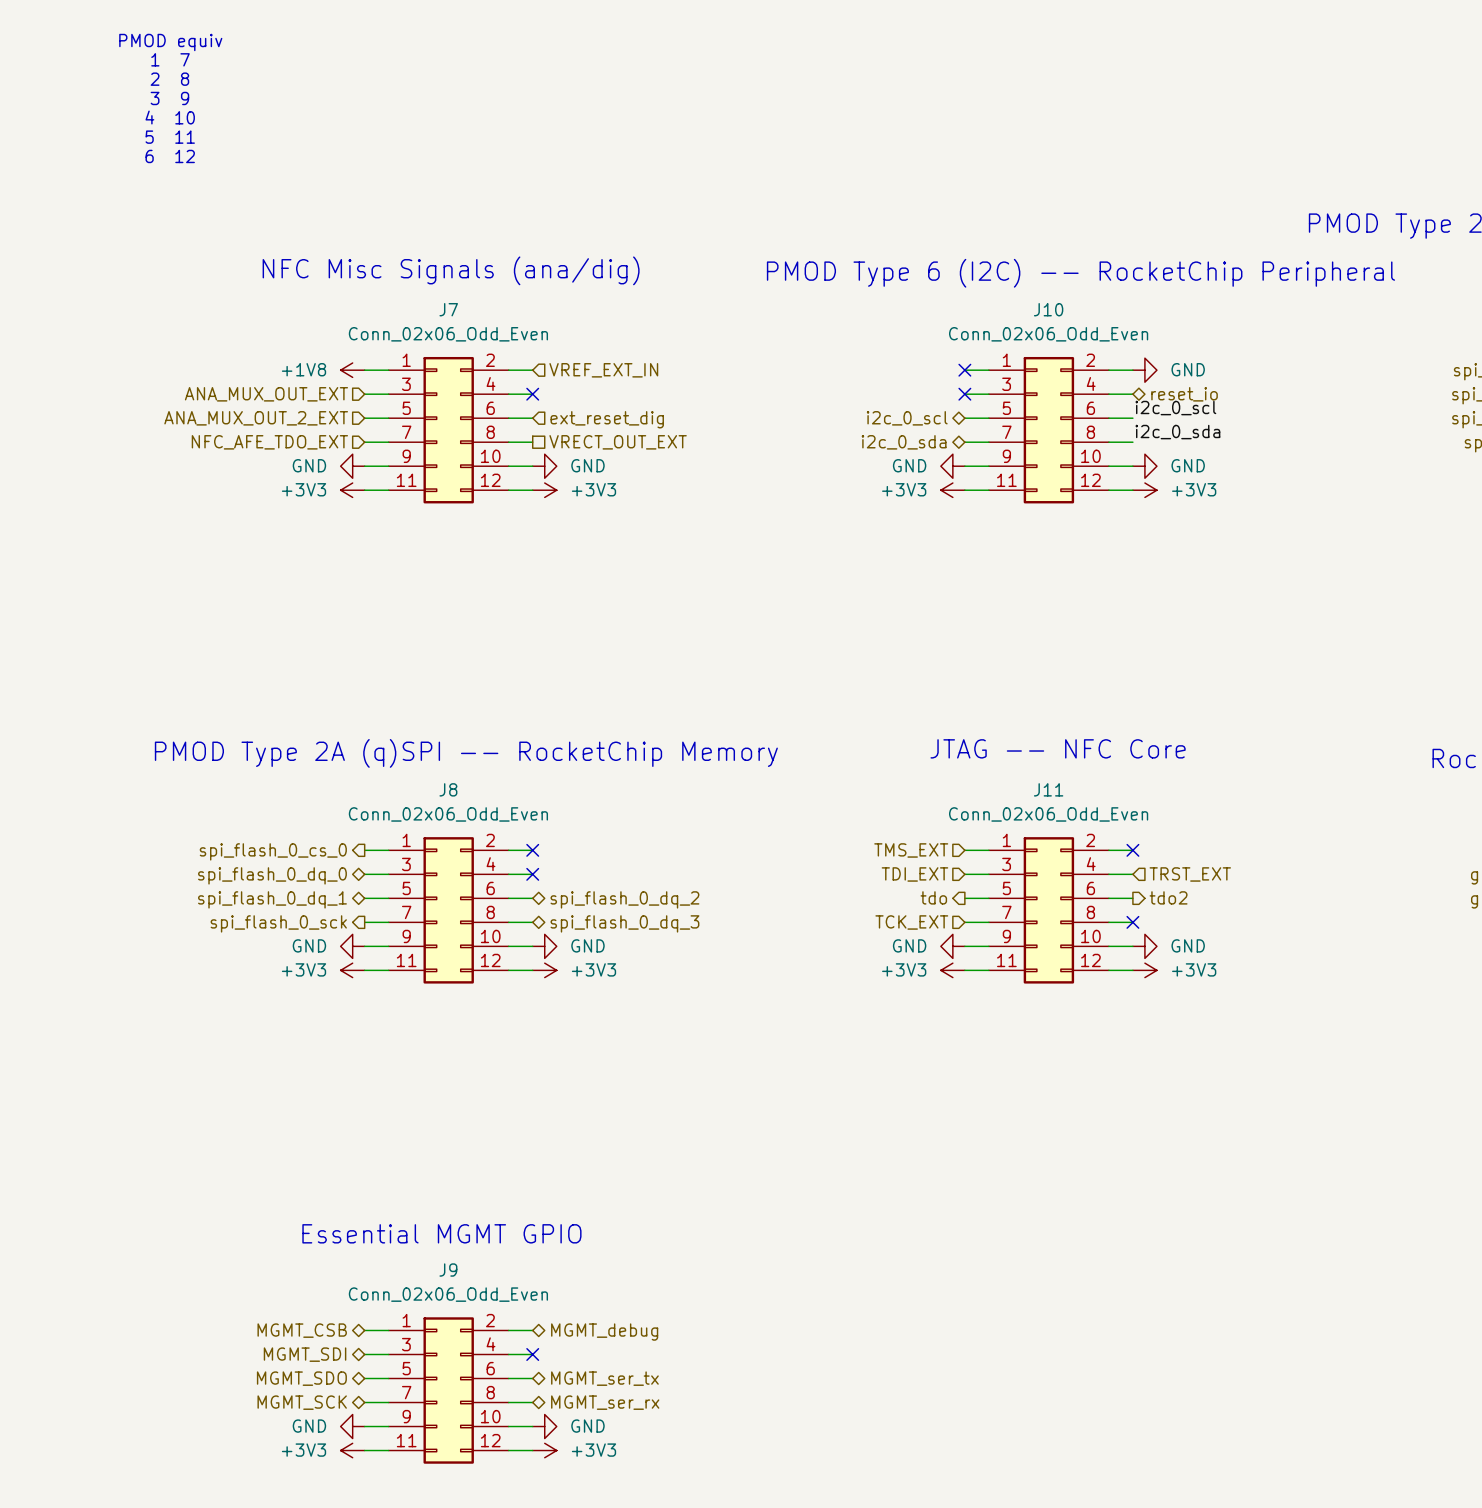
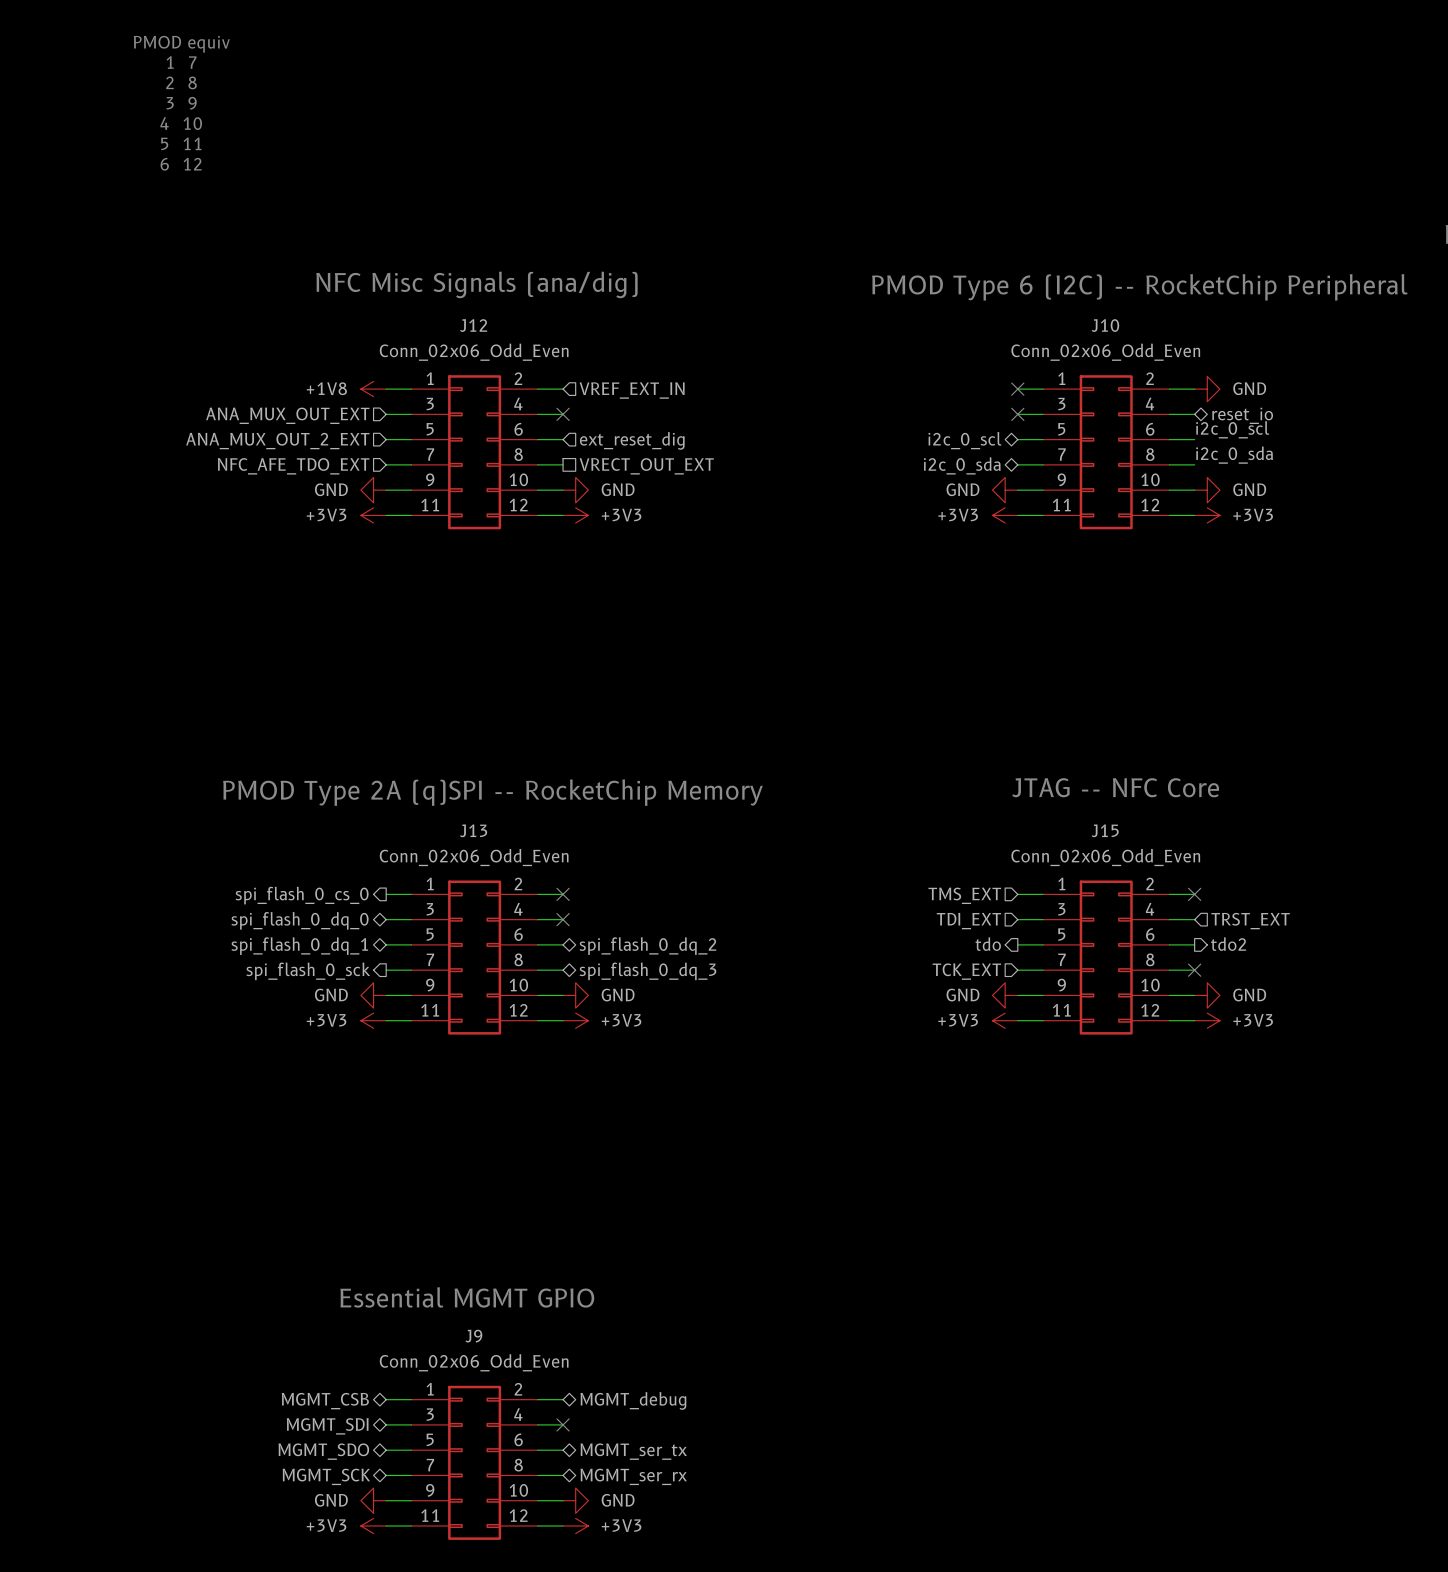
J7 name: J7 (448, 309) -> J12 (473, 325)
J8 name: J8 (448, 789) -> J13 (473, 830)
J11 name: J11 (1048, 789) -> J15 (1105, 830)

